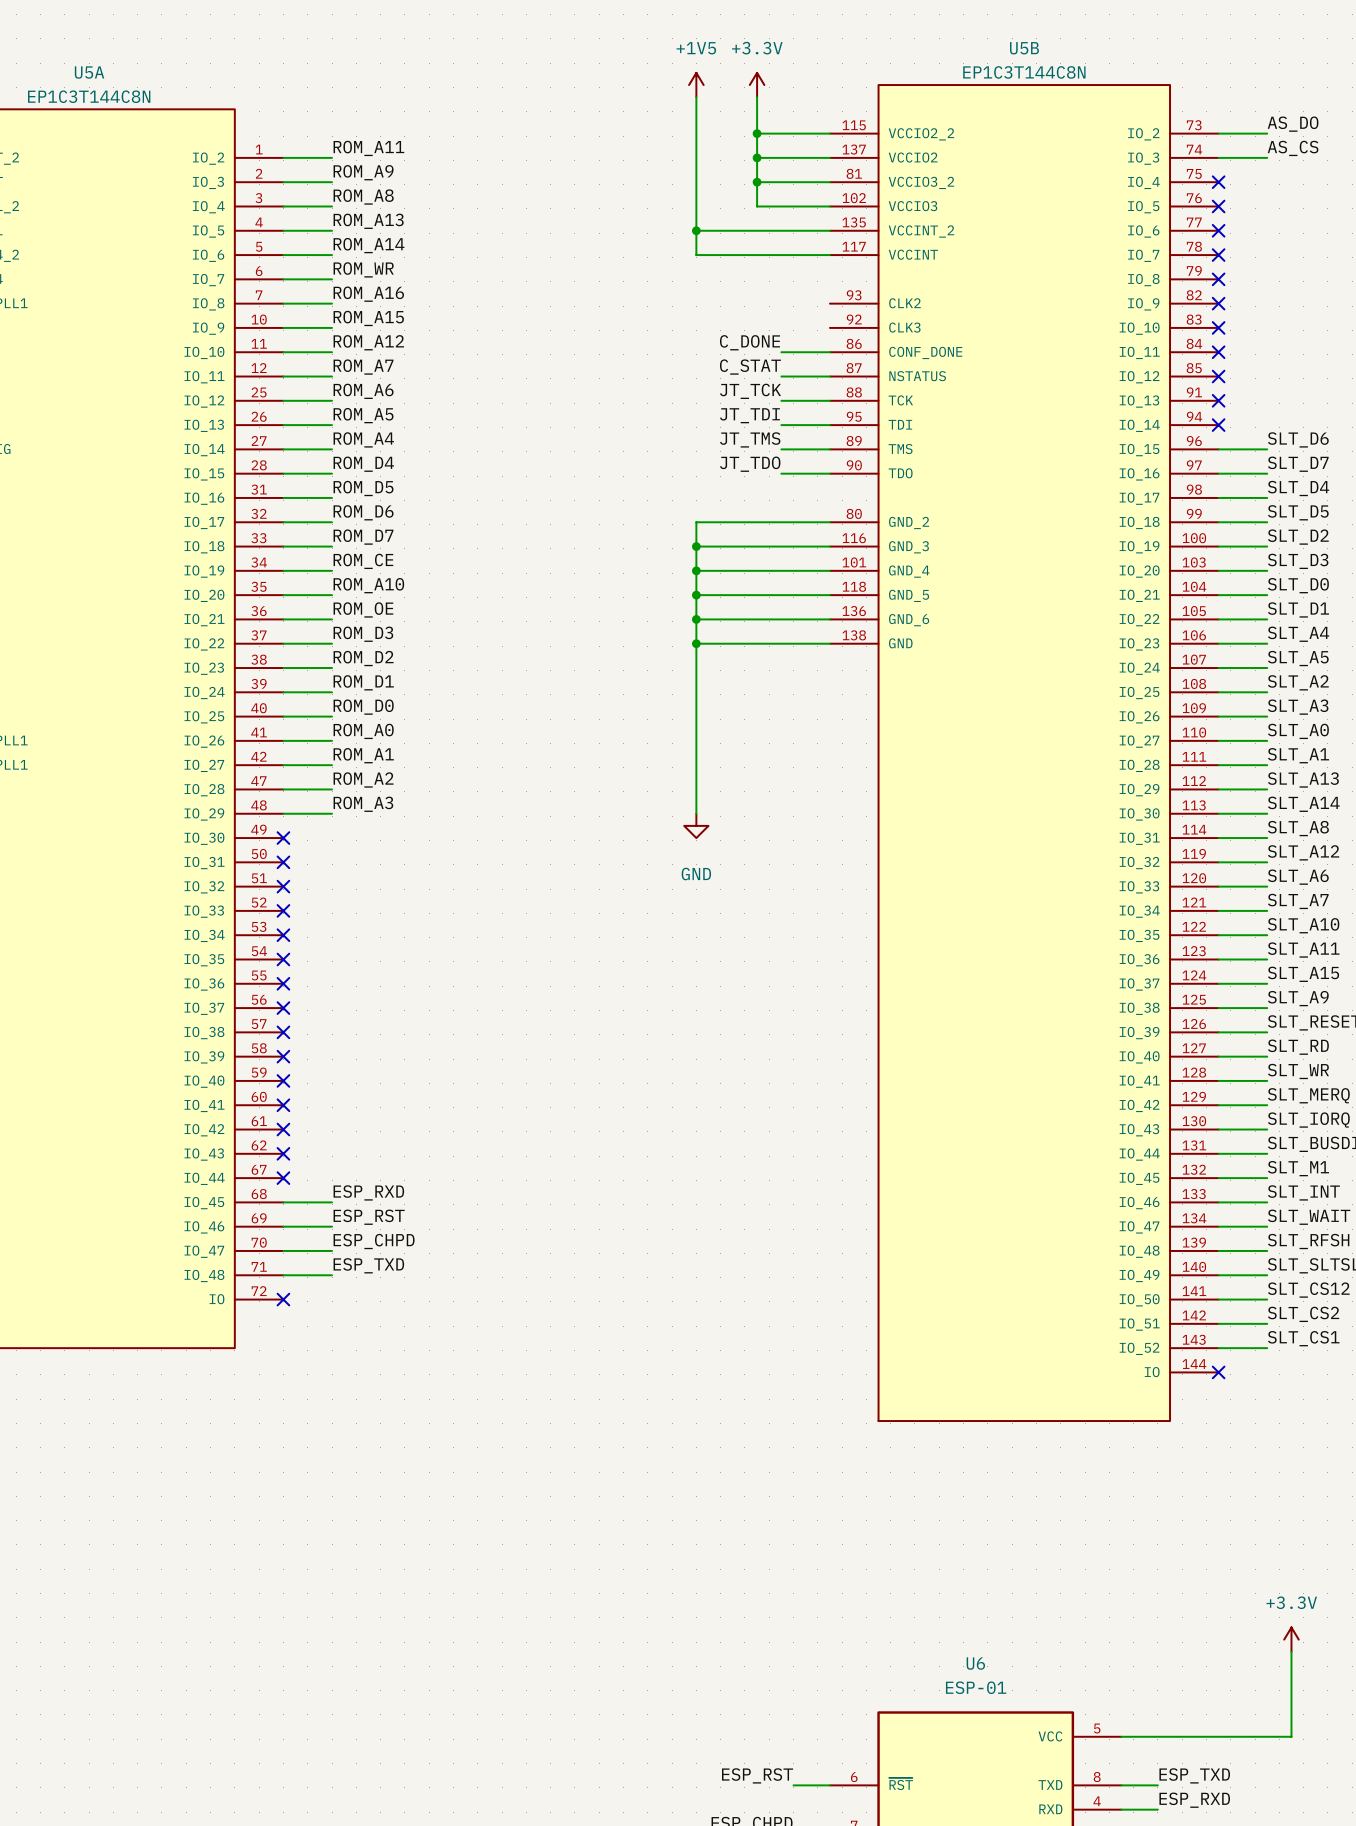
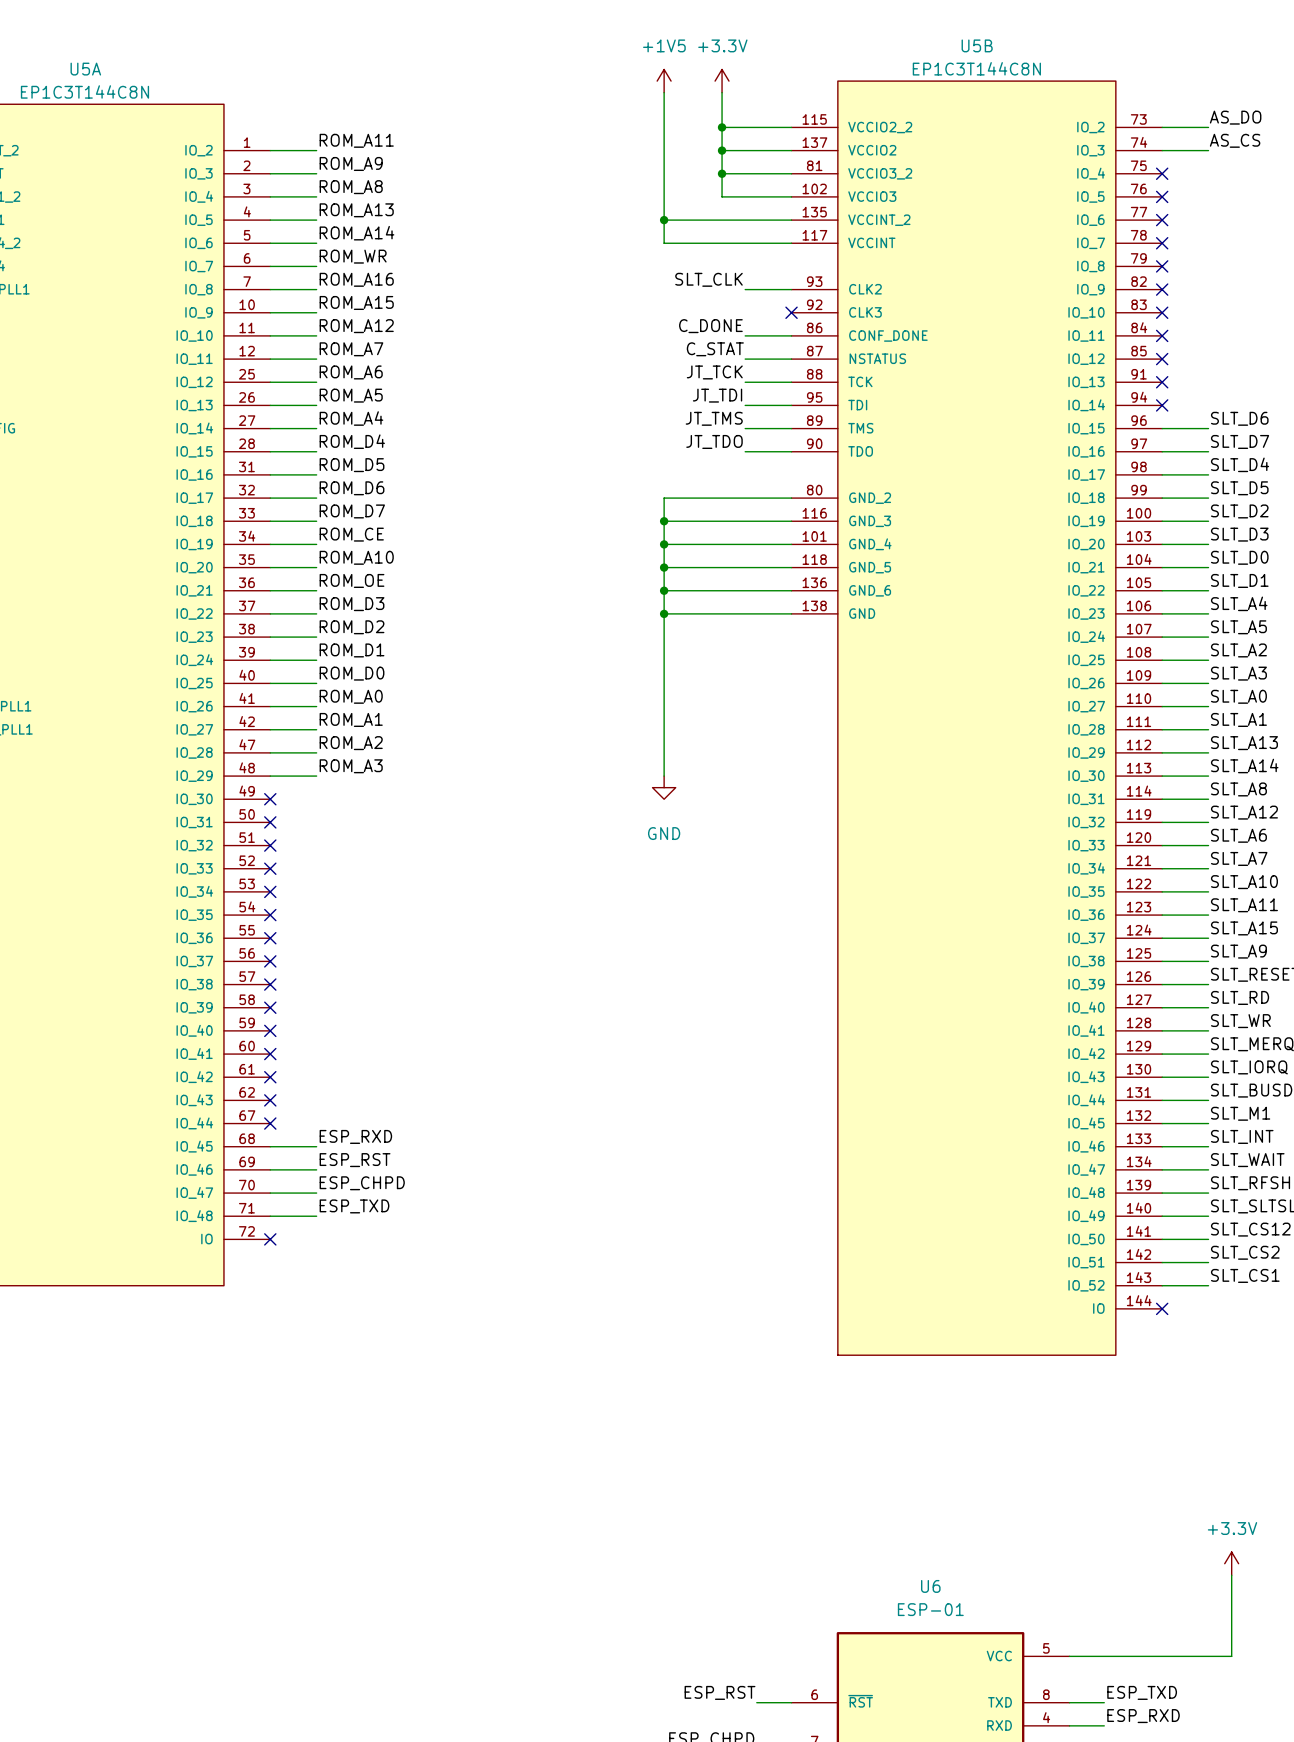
label: none -> SLT_CLK (708, 279)
wire: none -> (745, 289) (791, 289)
no-connect mark: none -> (791, 312)

